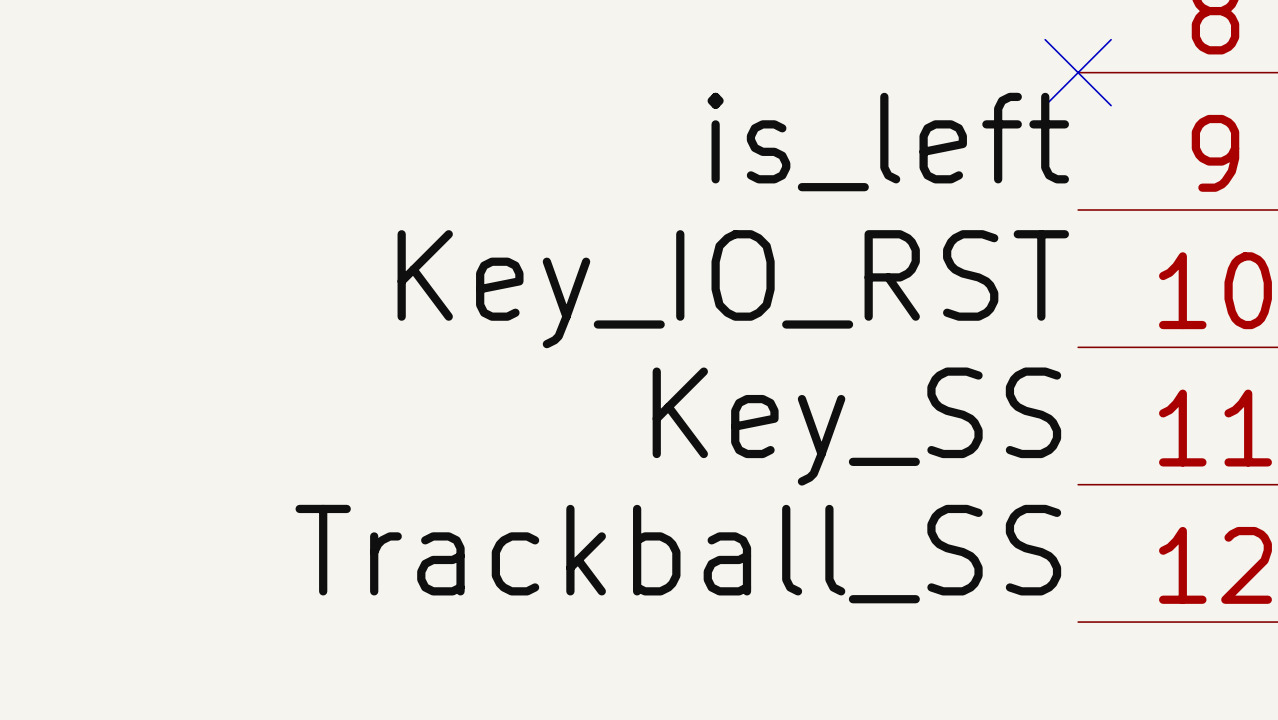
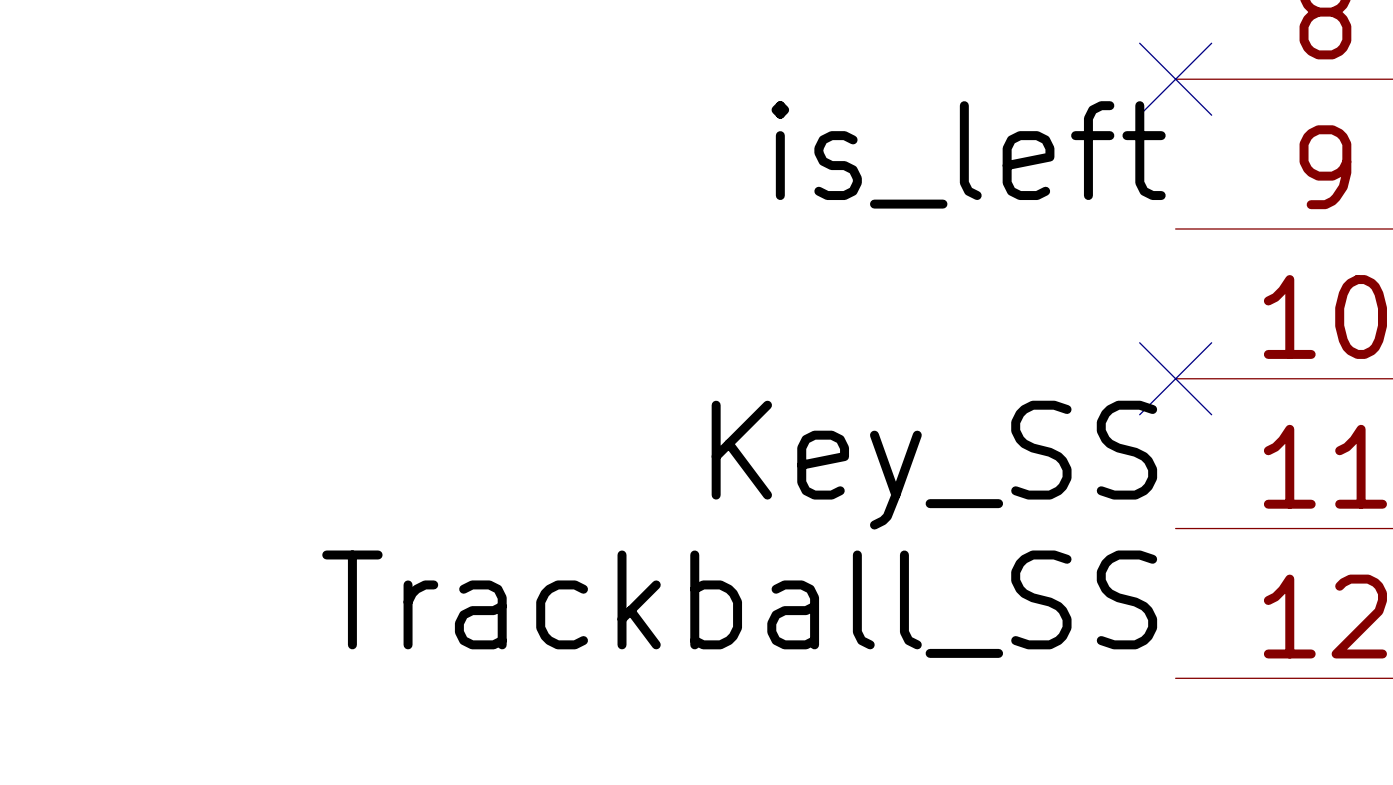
label: Key_IO_RST (733, 289) -> none
no-connect mark: none -> (1175, 378)

